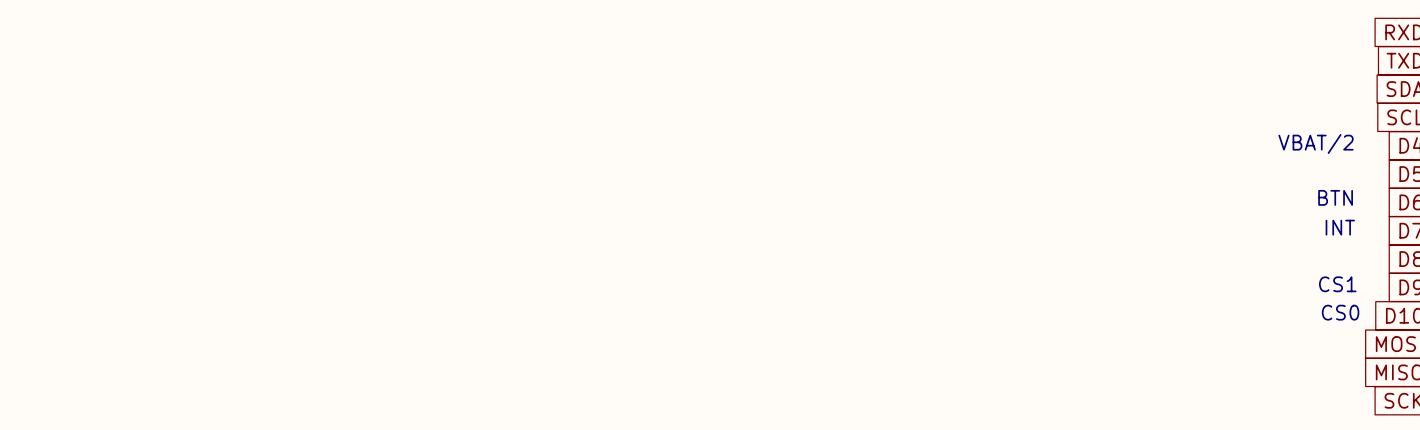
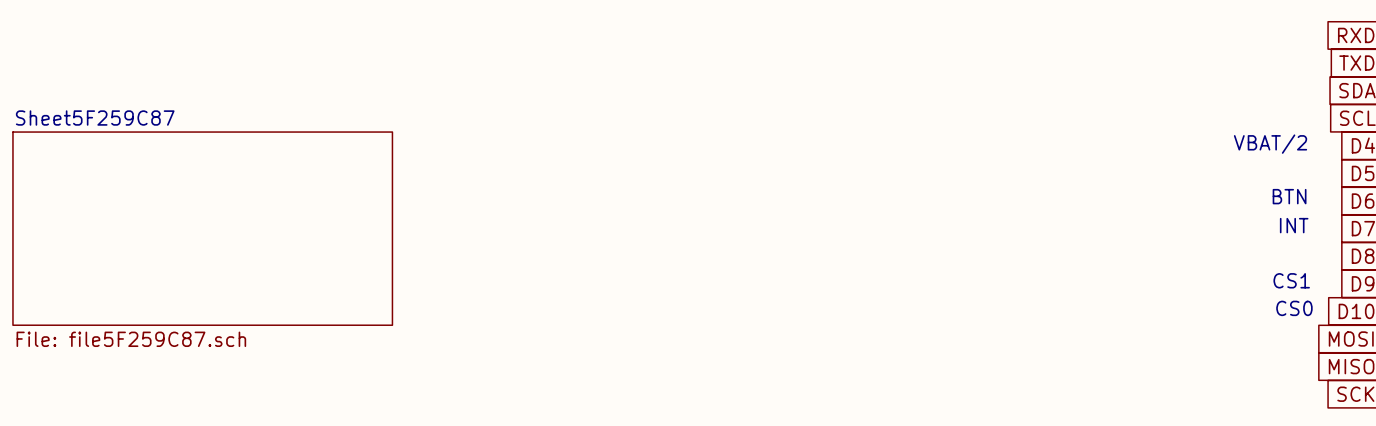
sheet Sheet5F259C87: none -> File: file5F259C87.sch (202, 228)

